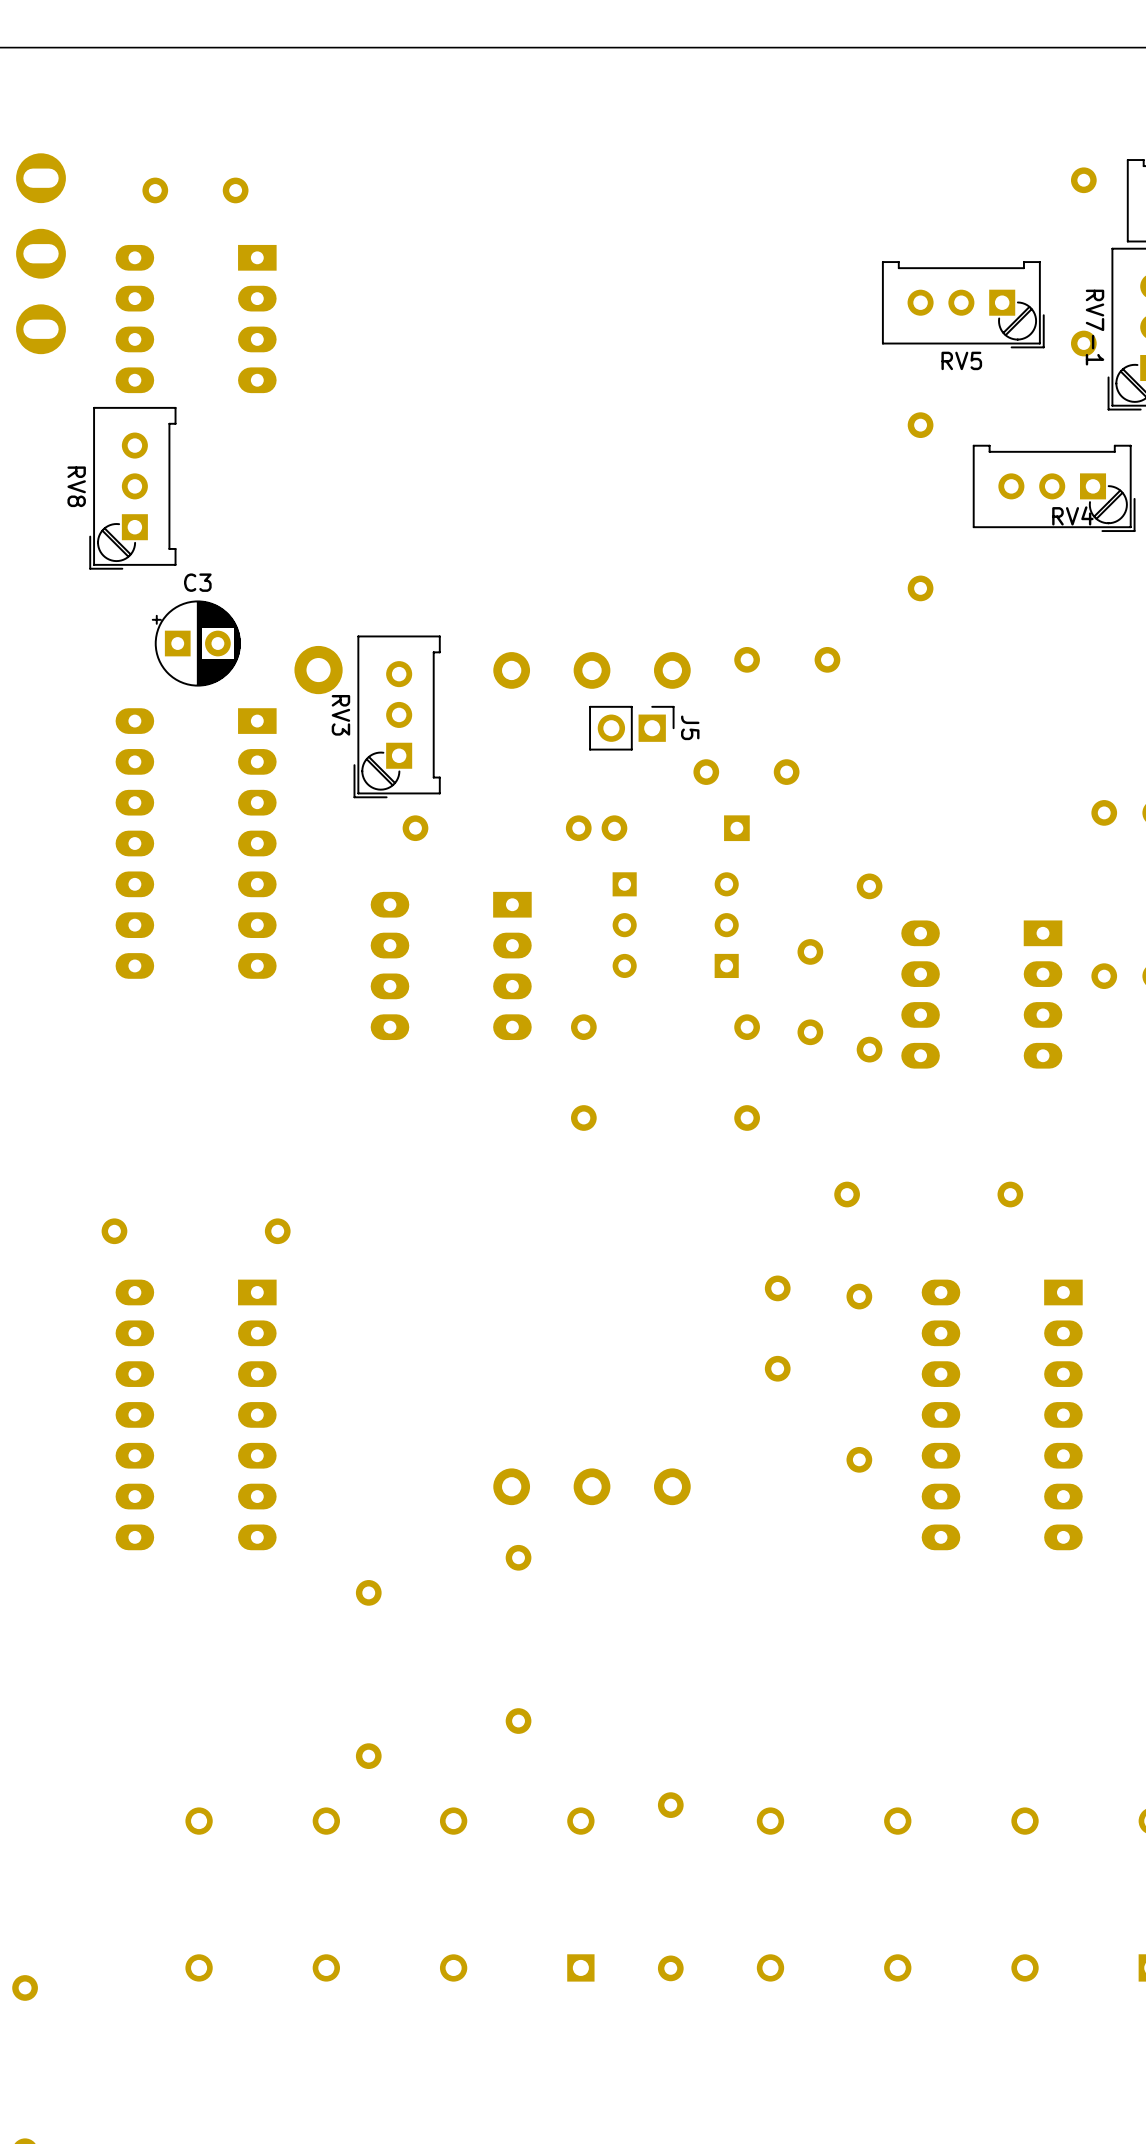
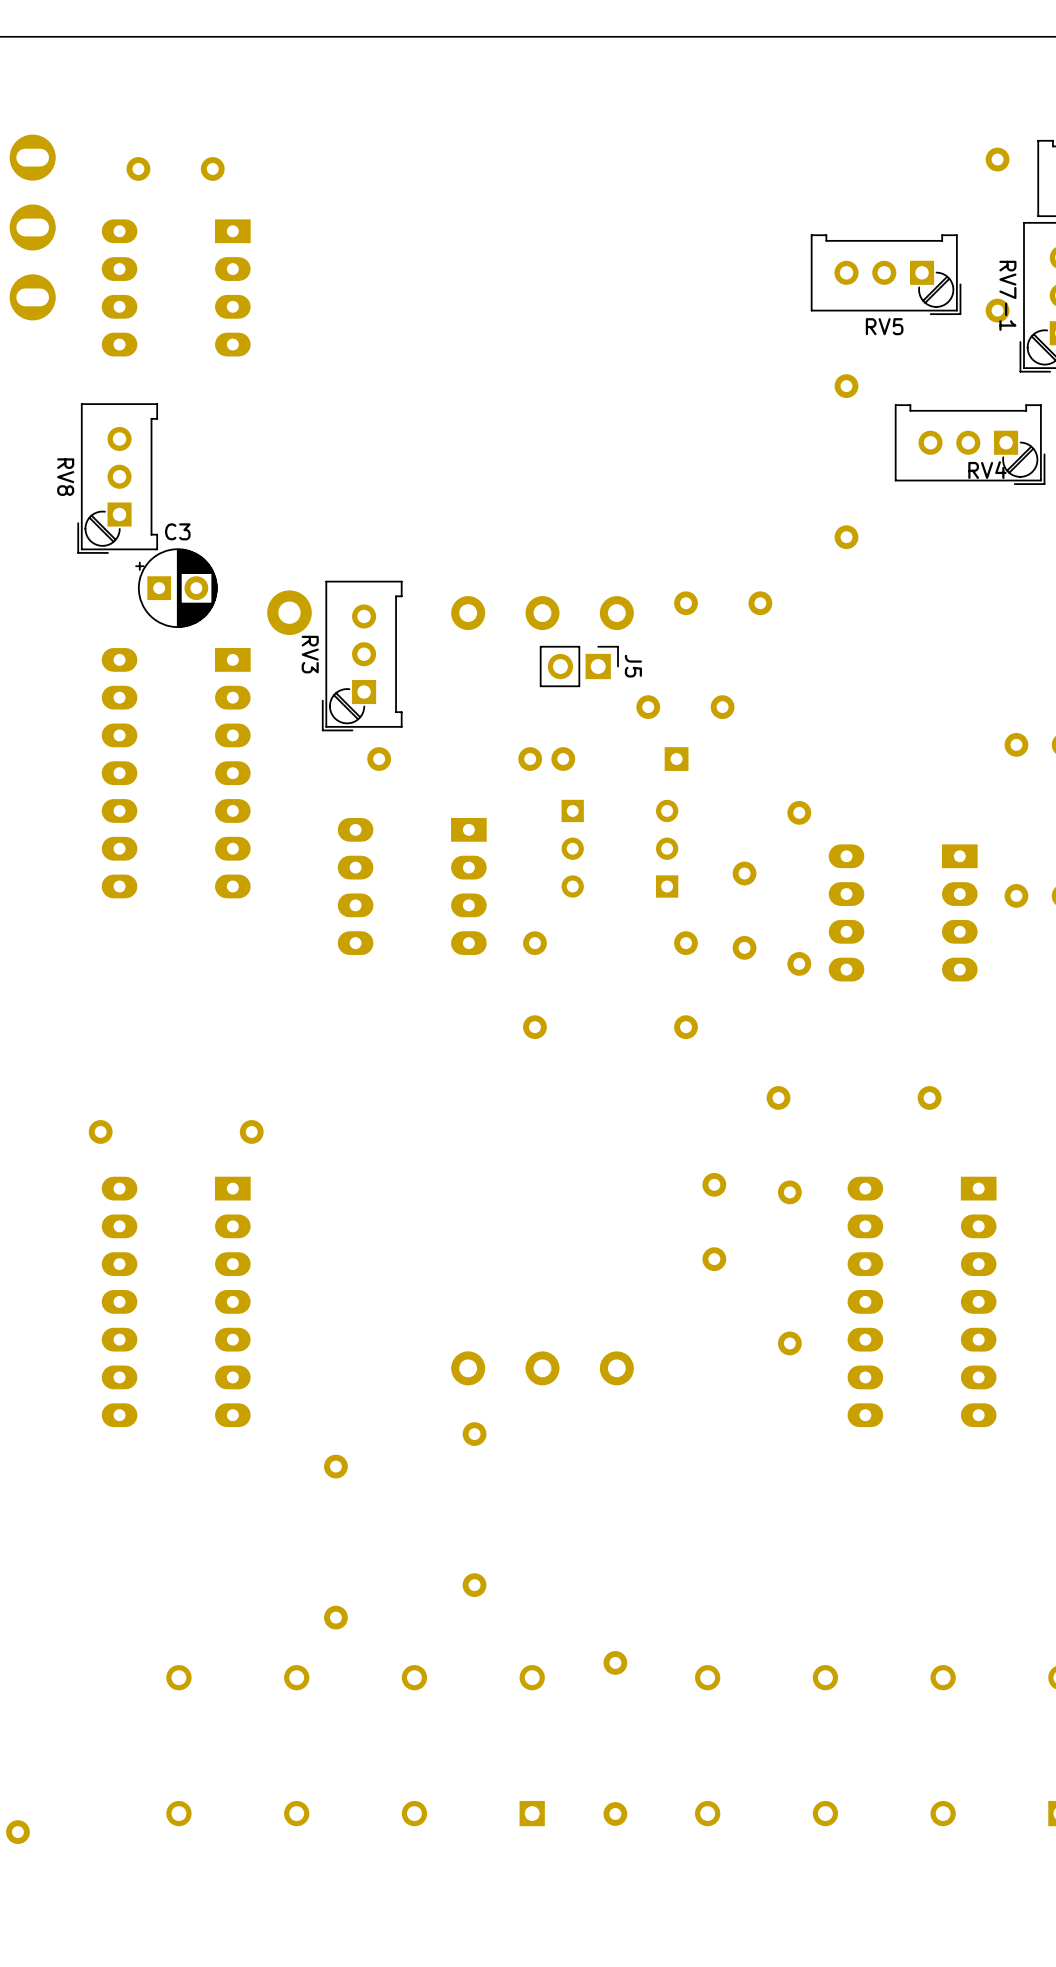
RV8 position: (132, 488) -> (117, 478)

